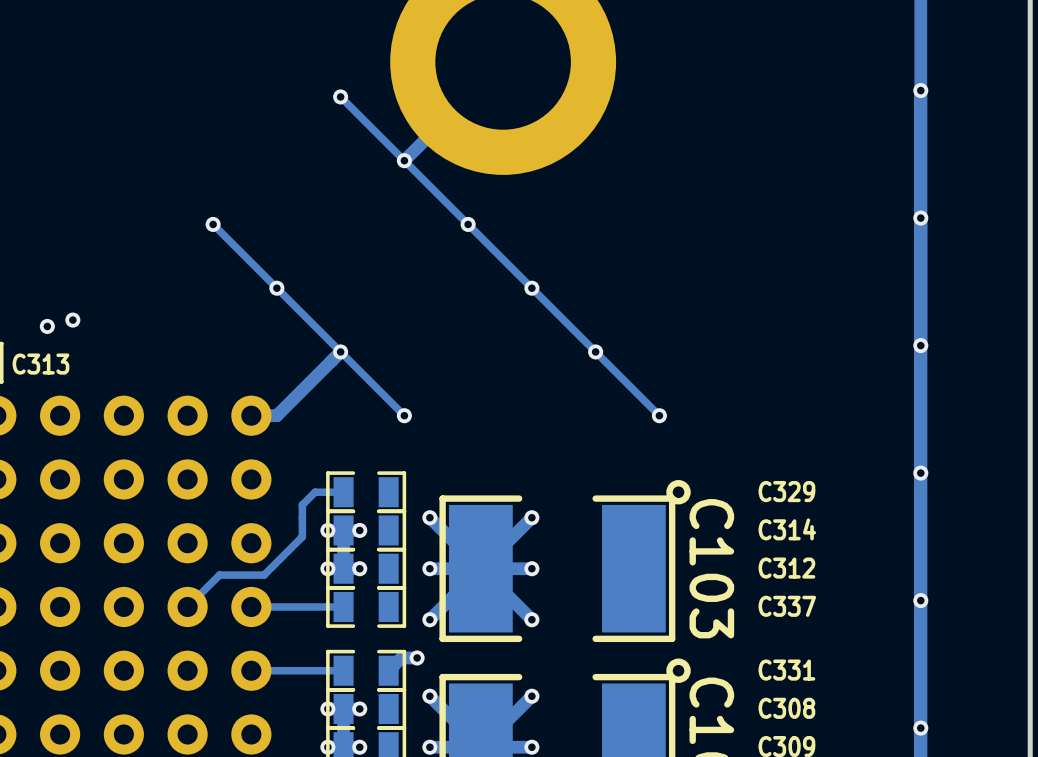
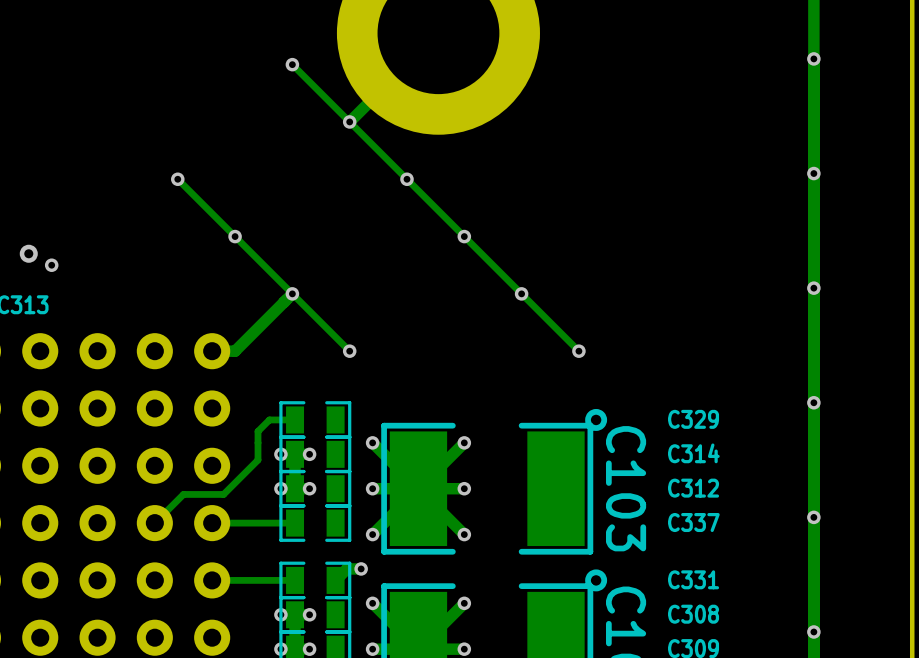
via: none -> (28, 253)
via: (47, 326) -> none

